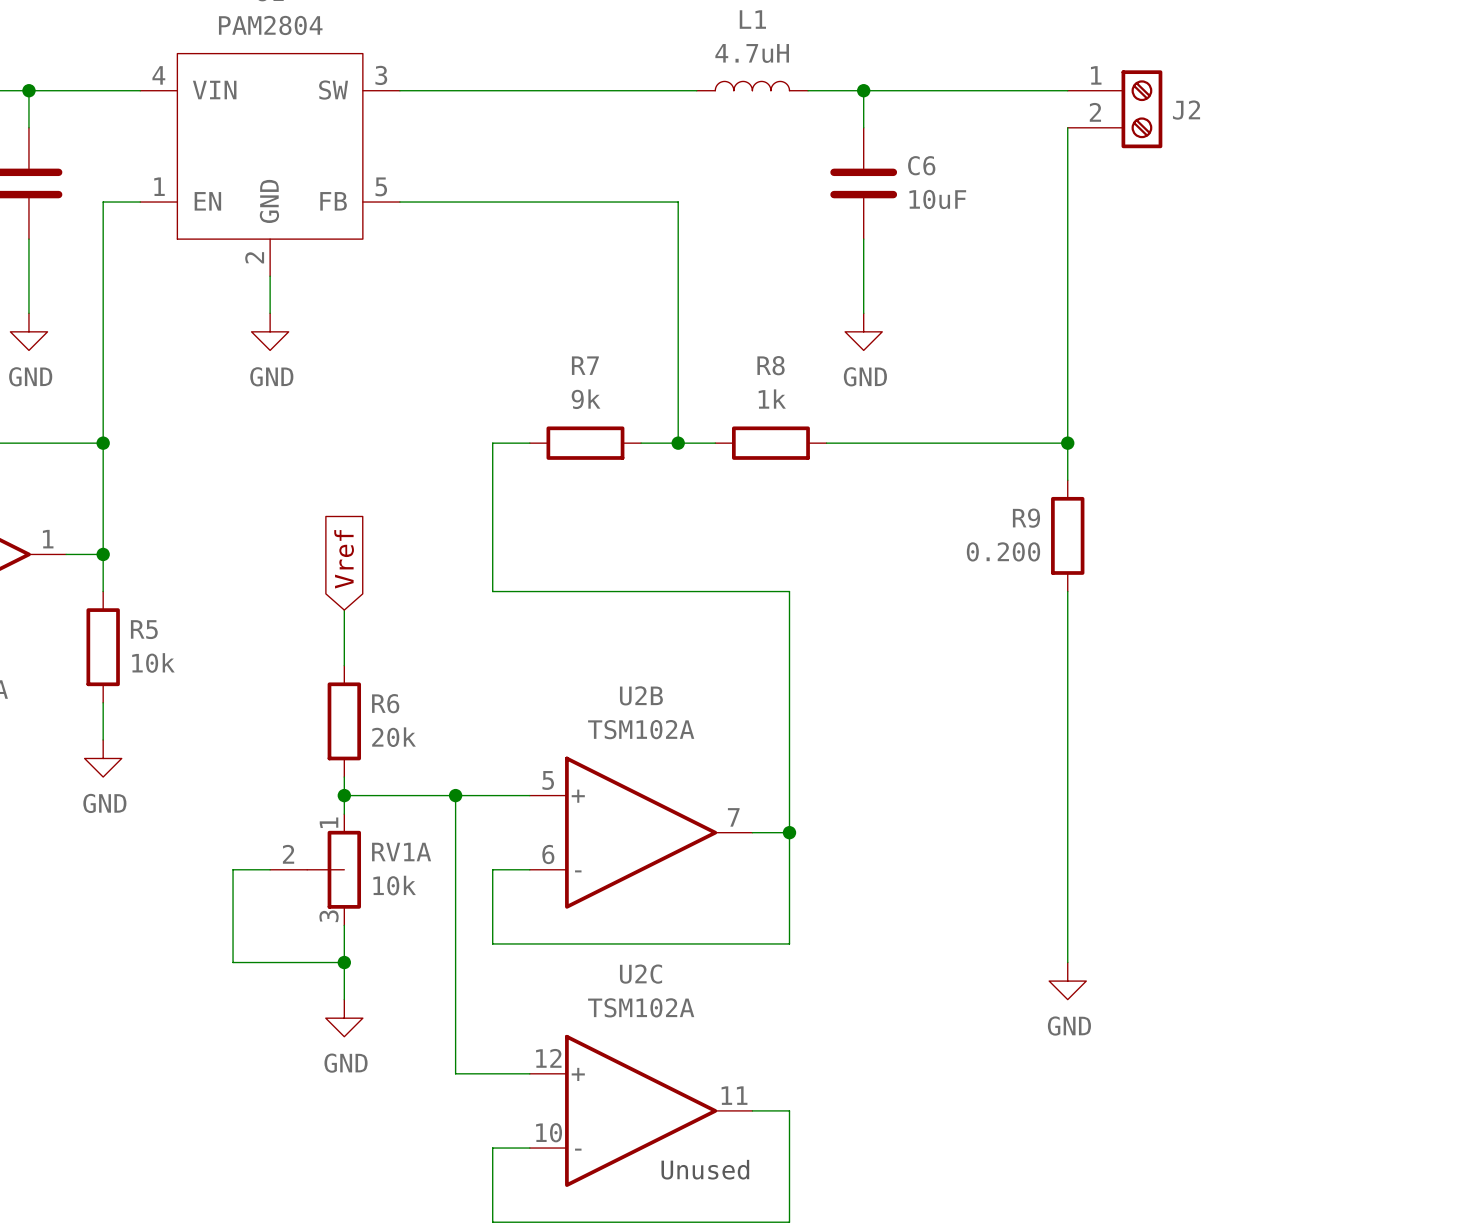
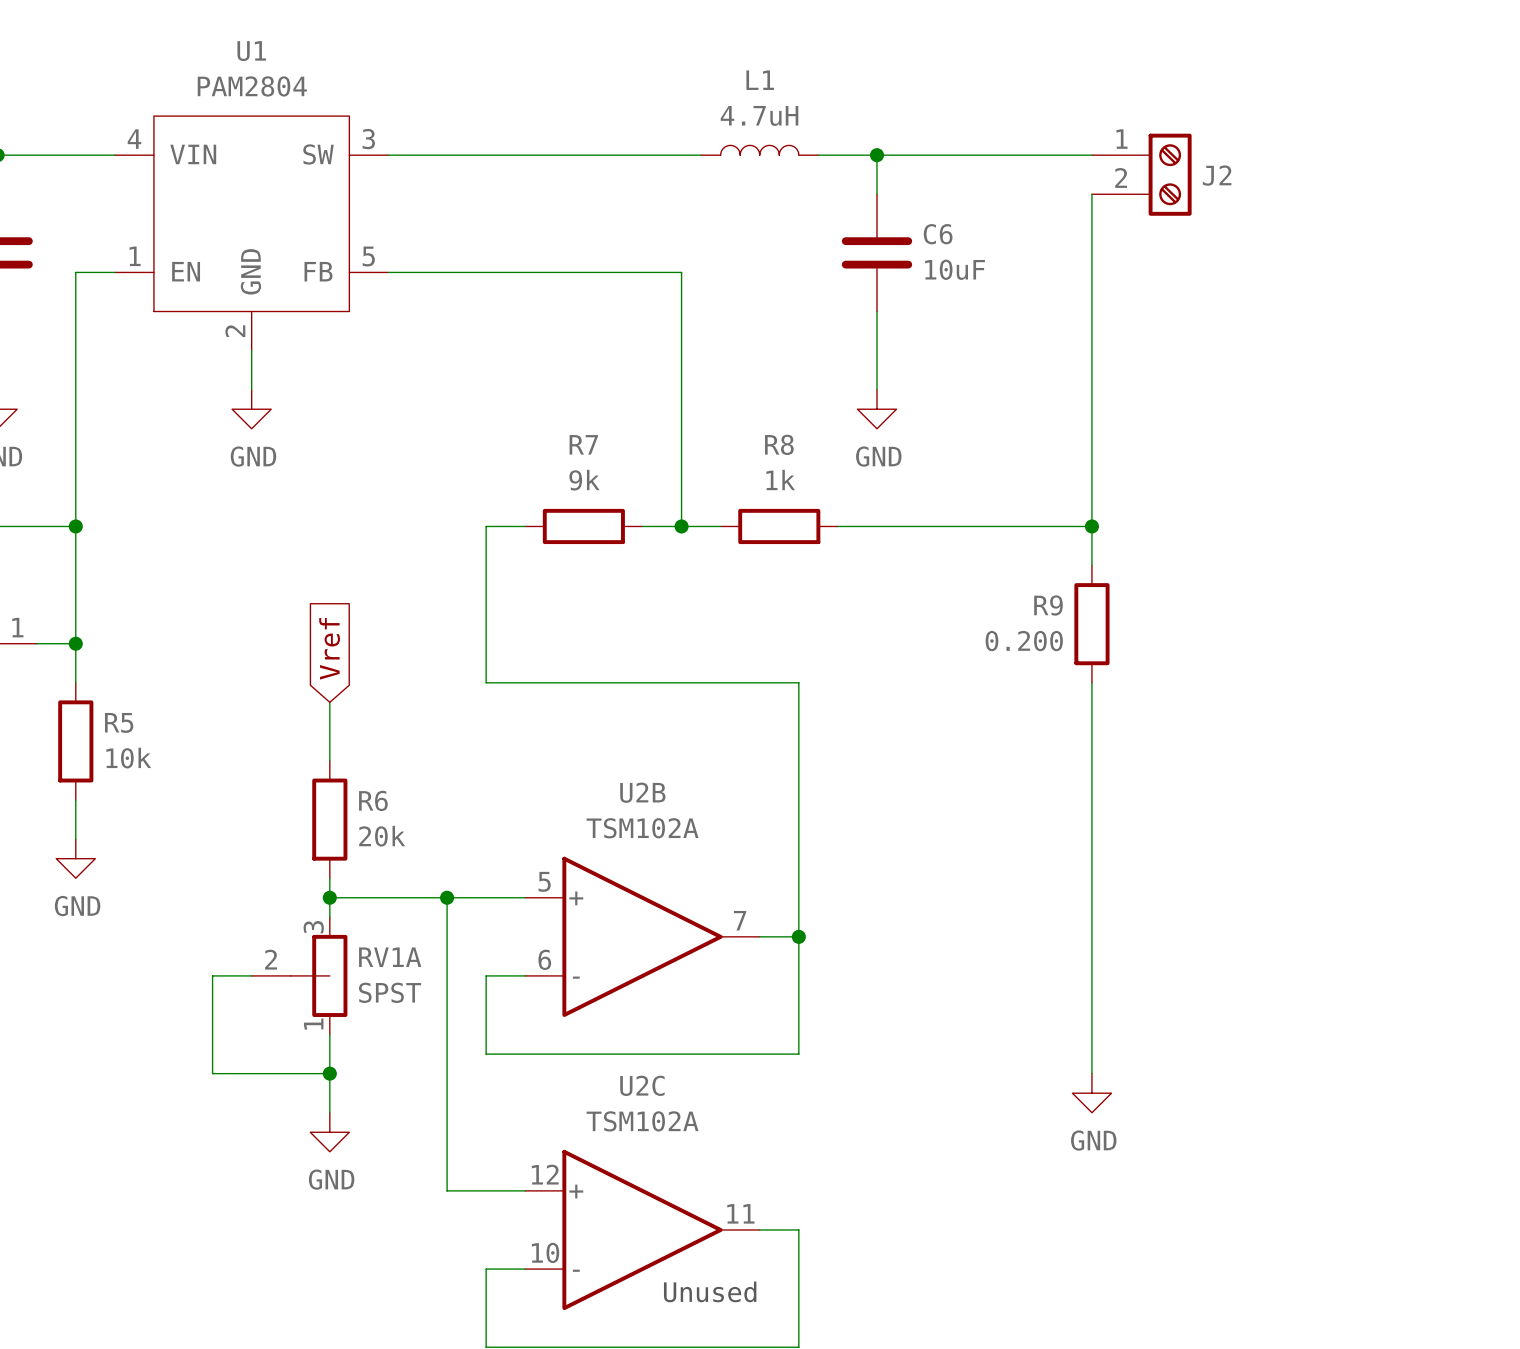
RV1A flip: as is (334, 869) -> up-down (319, 975)
RV1A value: 10k (394, 885) -> SPST (390, 992)

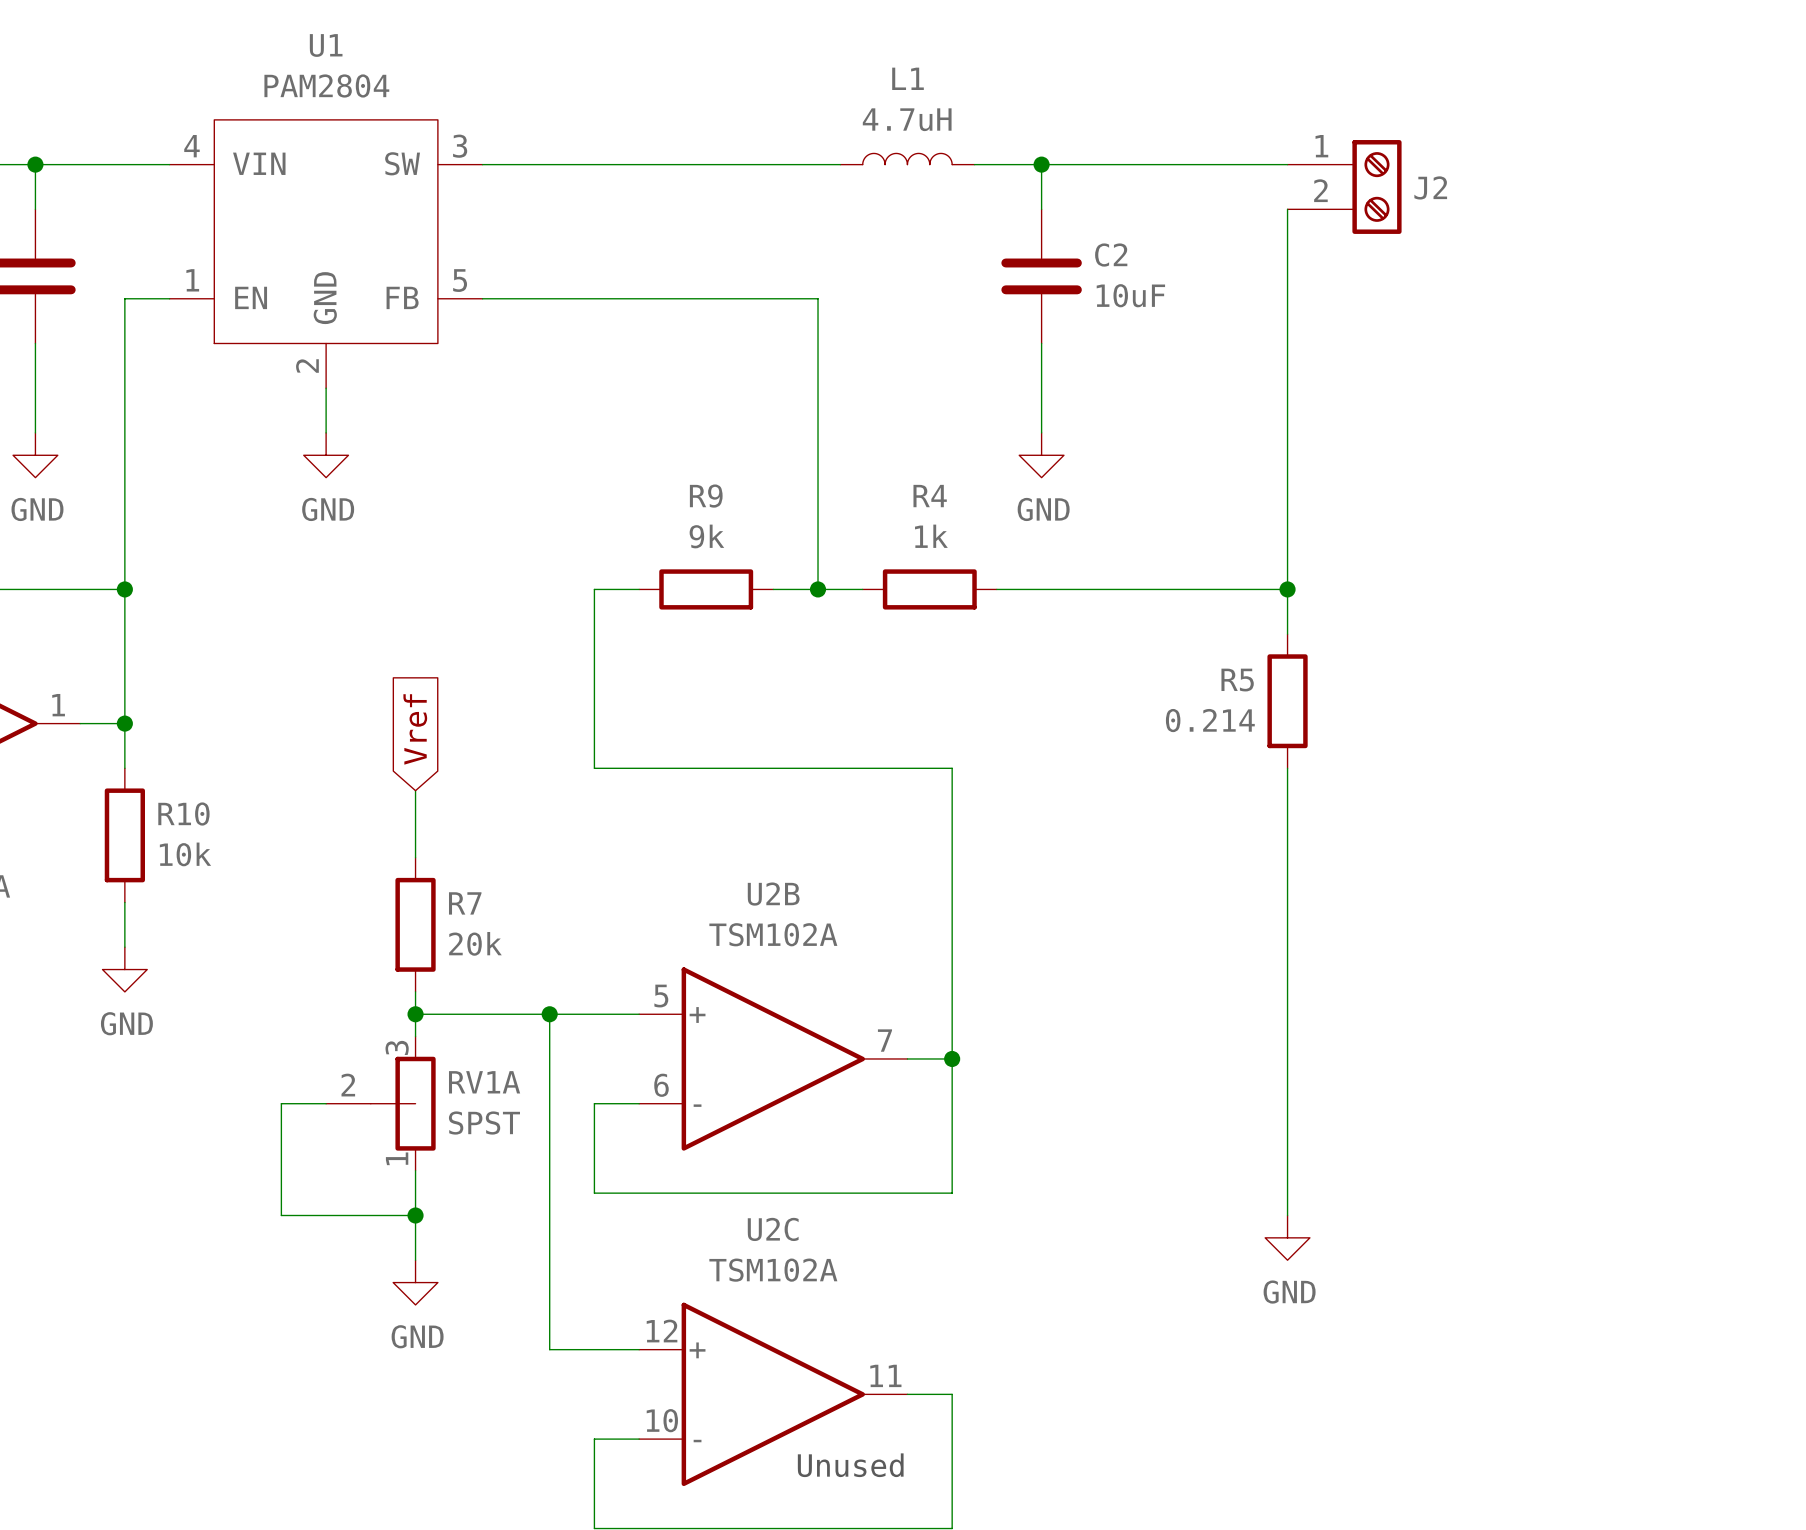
C6 name: C6 (938, 234) -> C2 (1111, 255)
R7 name: R7 (583, 444) -> R9 (706, 496)
R8 name: R8 (779, 444) -> R4 (930, 496)
R9 name: R9 (1048, 605) -> R5 (1237, 680)
R9 value: 0.200 (1024, 641) -> 0.214 (1210, 720)
R5 name: R5 (119, 722) -> R10 (183, 814)
R6 name: R6 (373, 800) -> R7 (465, 903)

